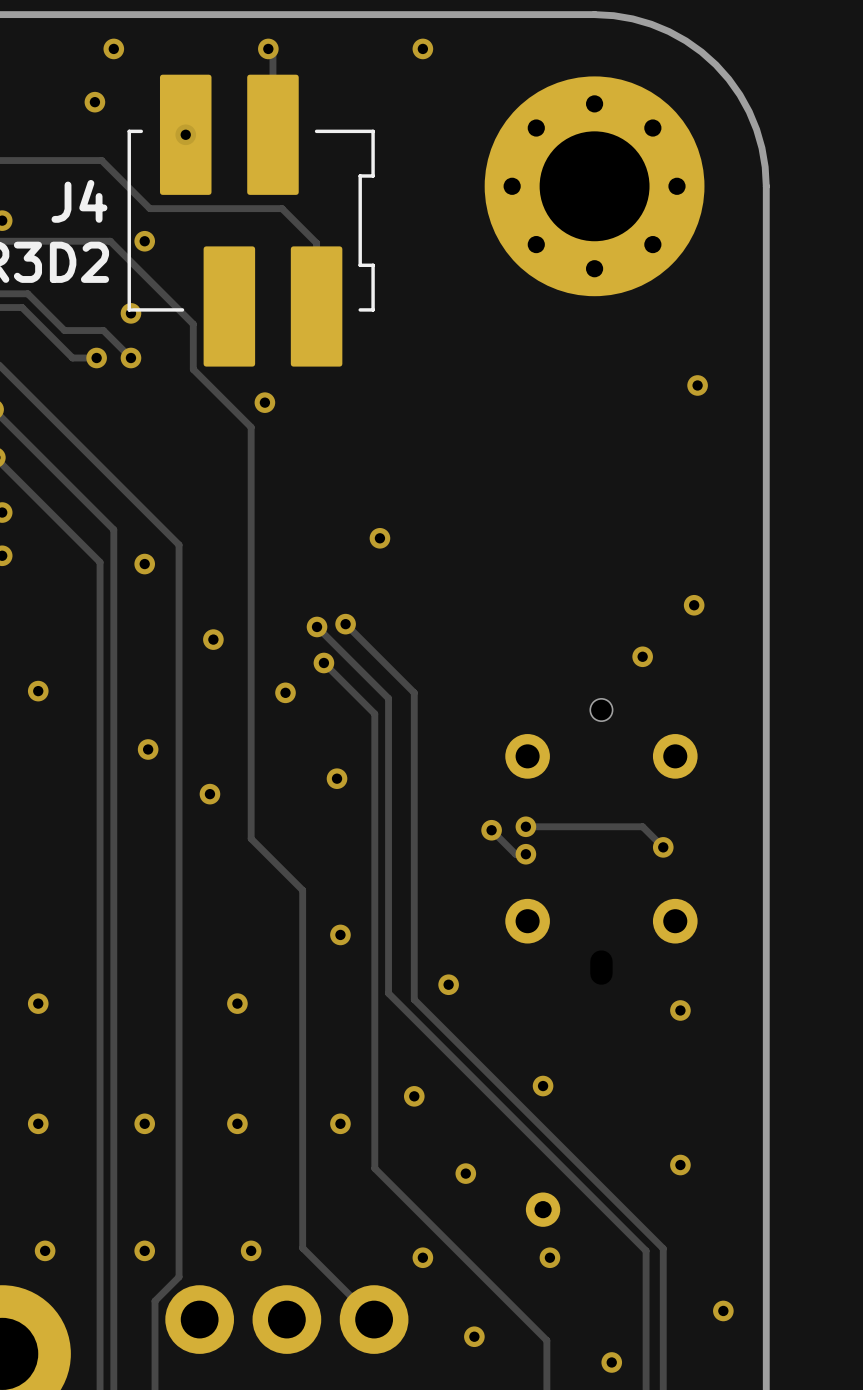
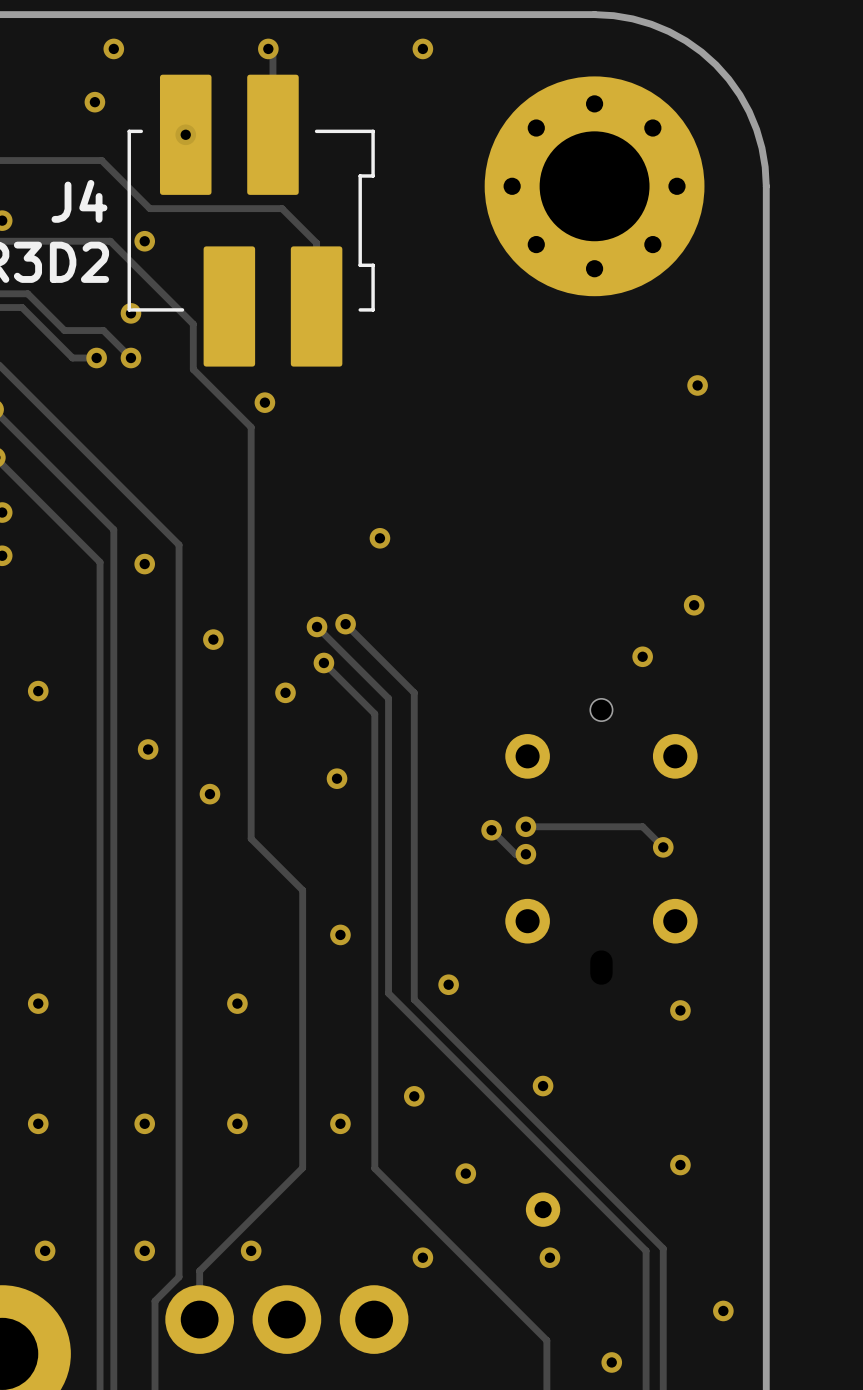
track: (302, 1167) (302, 1248) (374, 1319) -> (302, 1167) (199, 1270) (199, 1319)
via: (474, 1336) -> none

